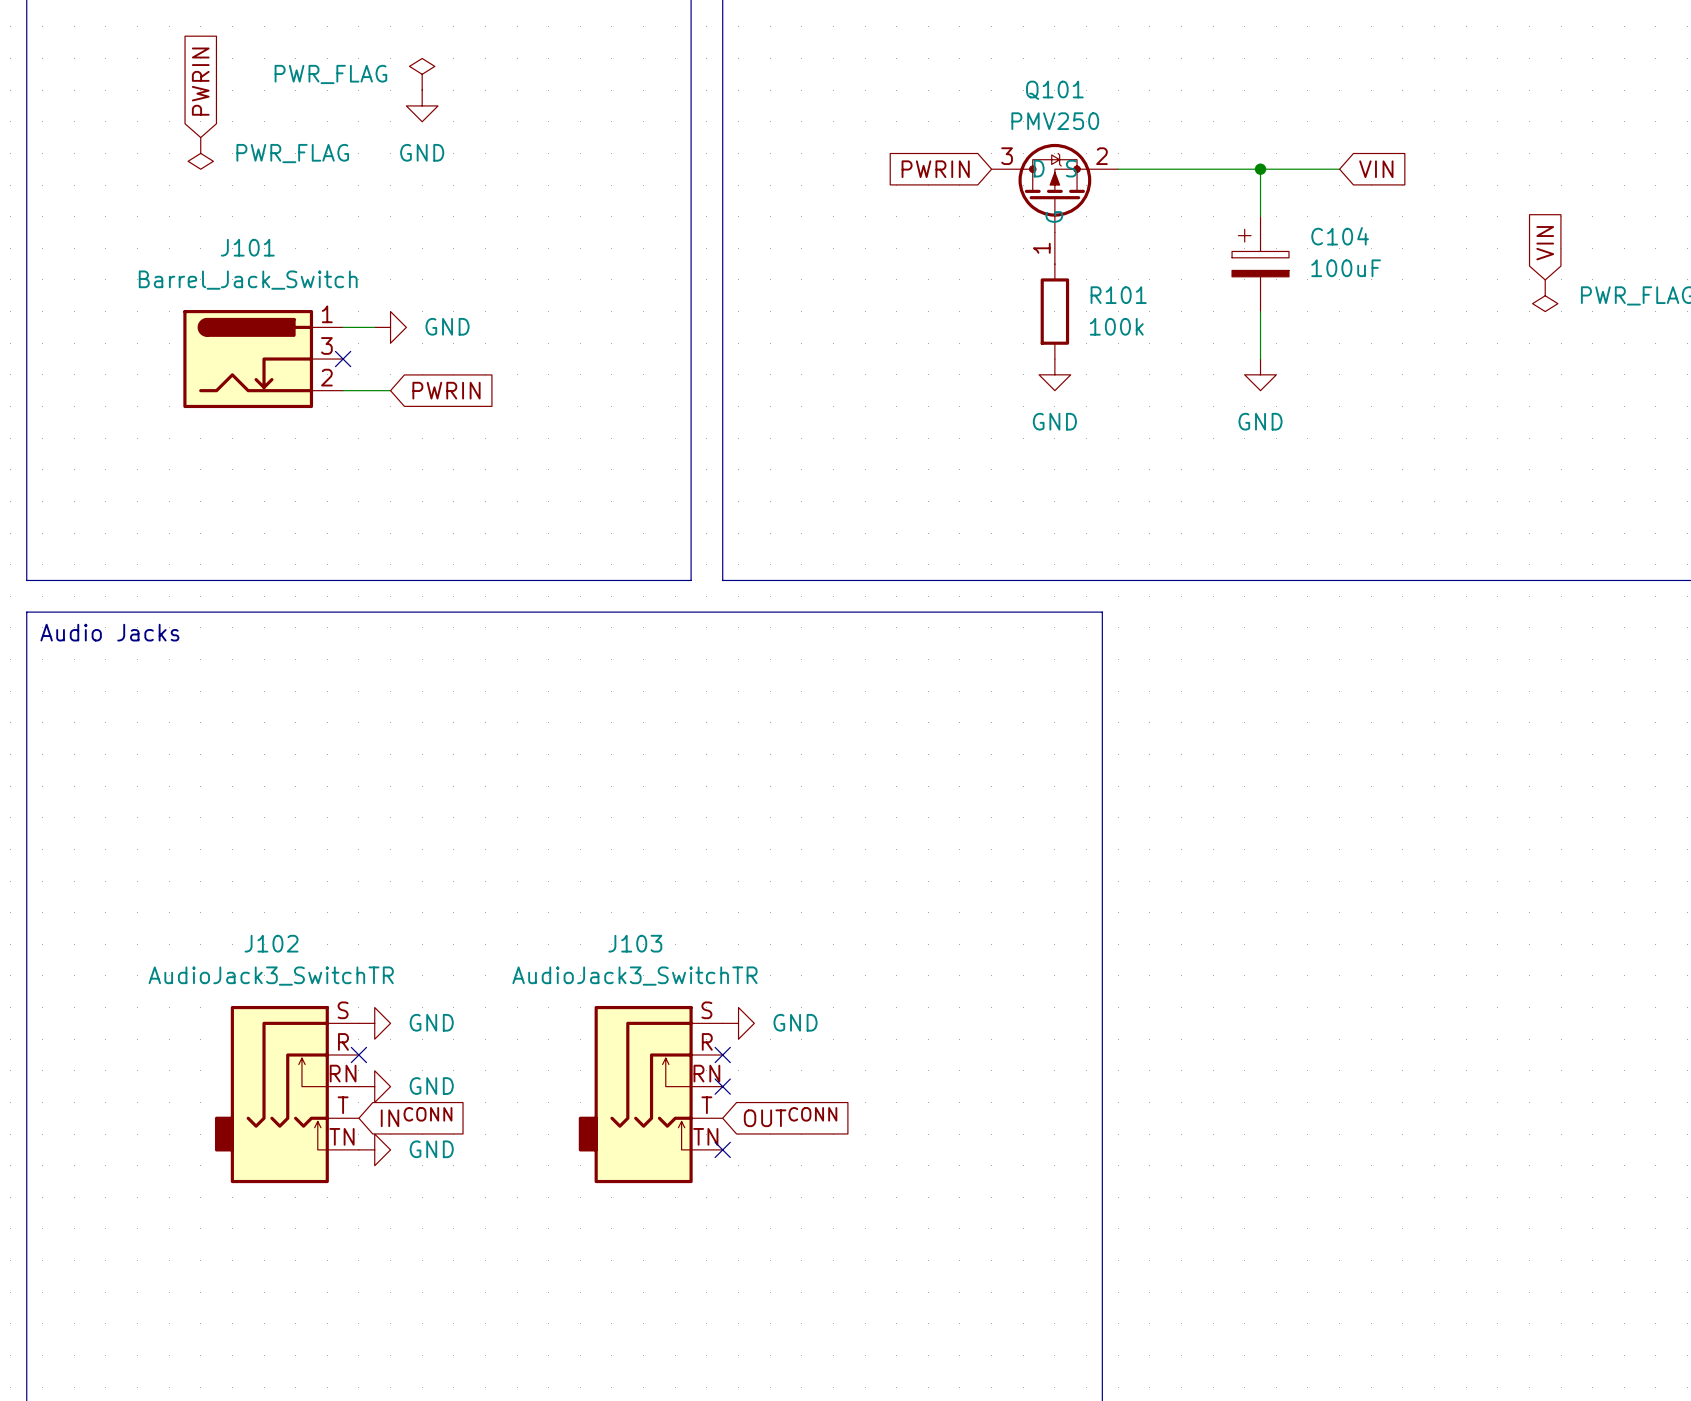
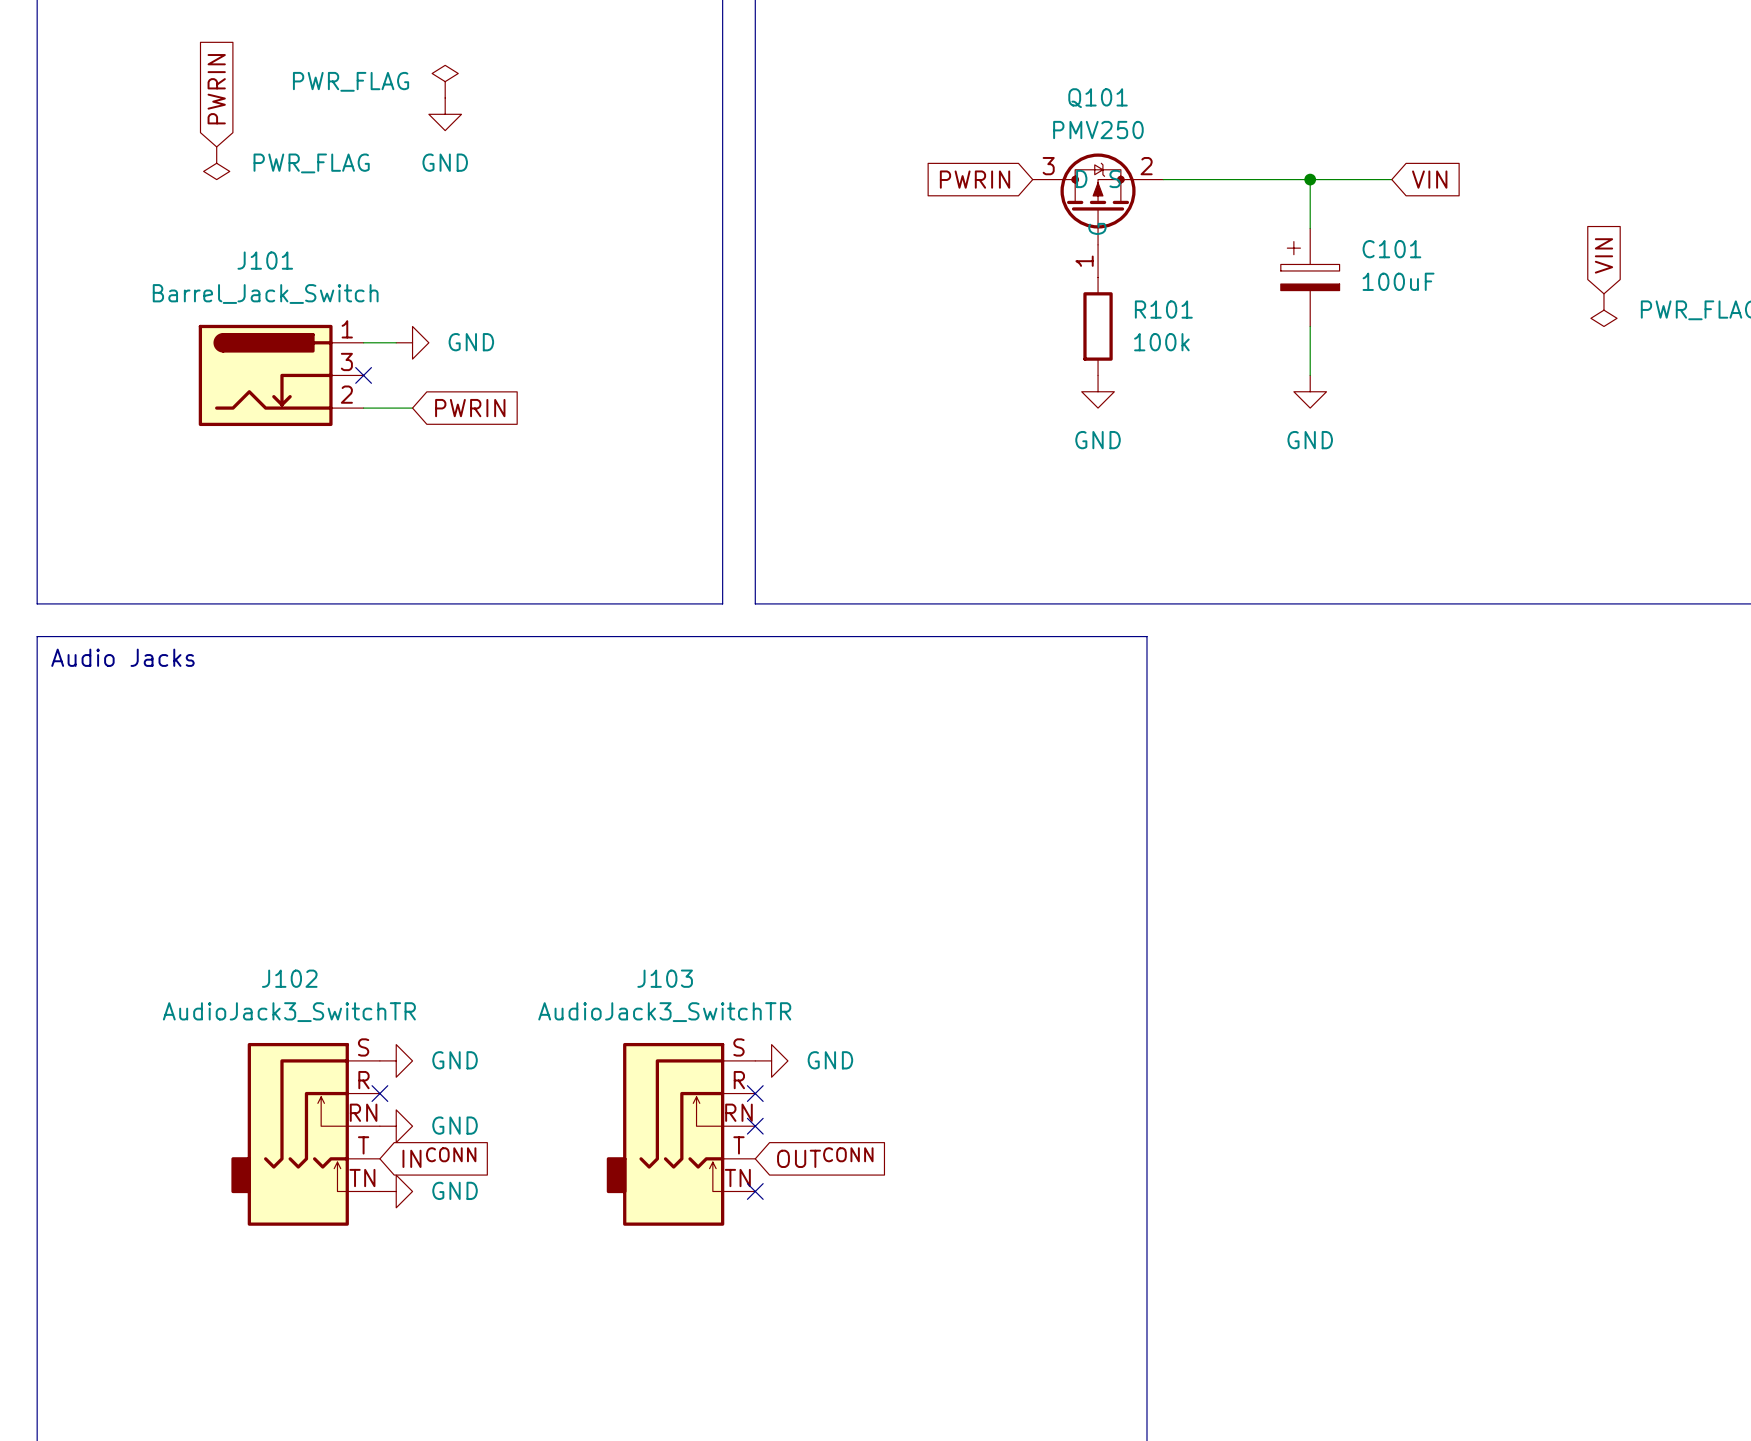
C104 name: C104 (1340, 236) -> C101 (1391, 249)

